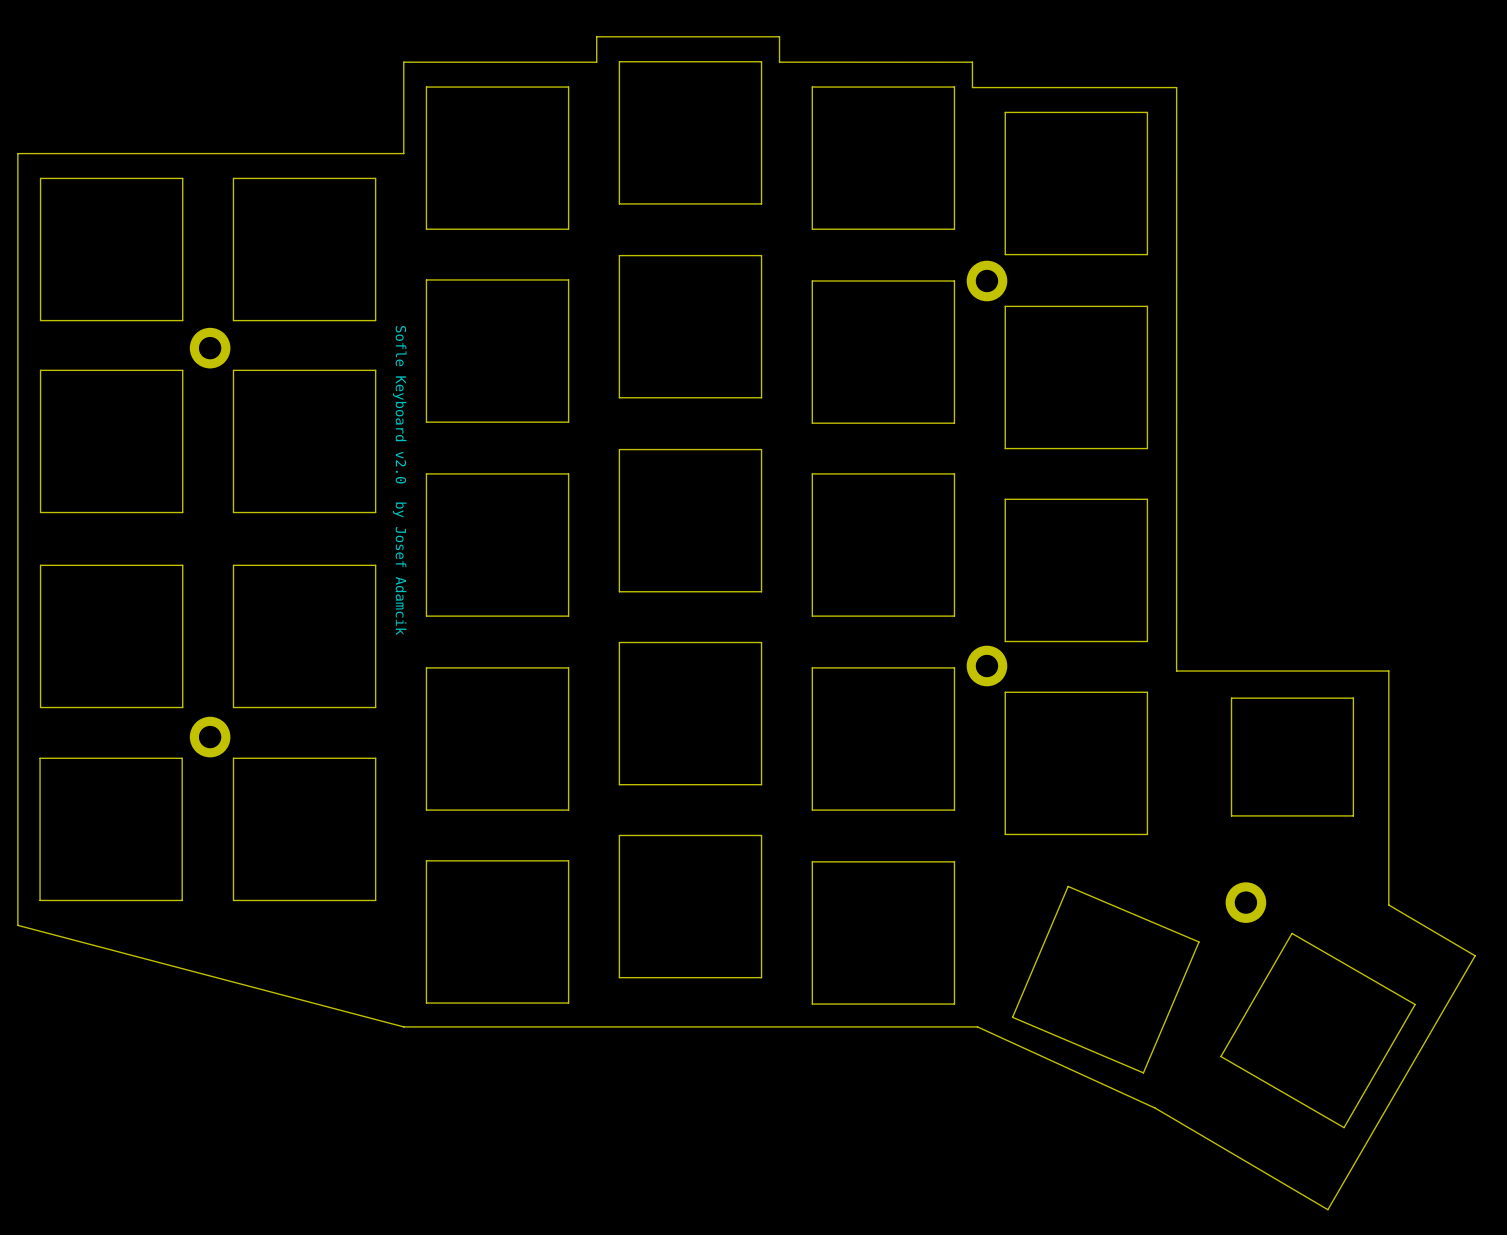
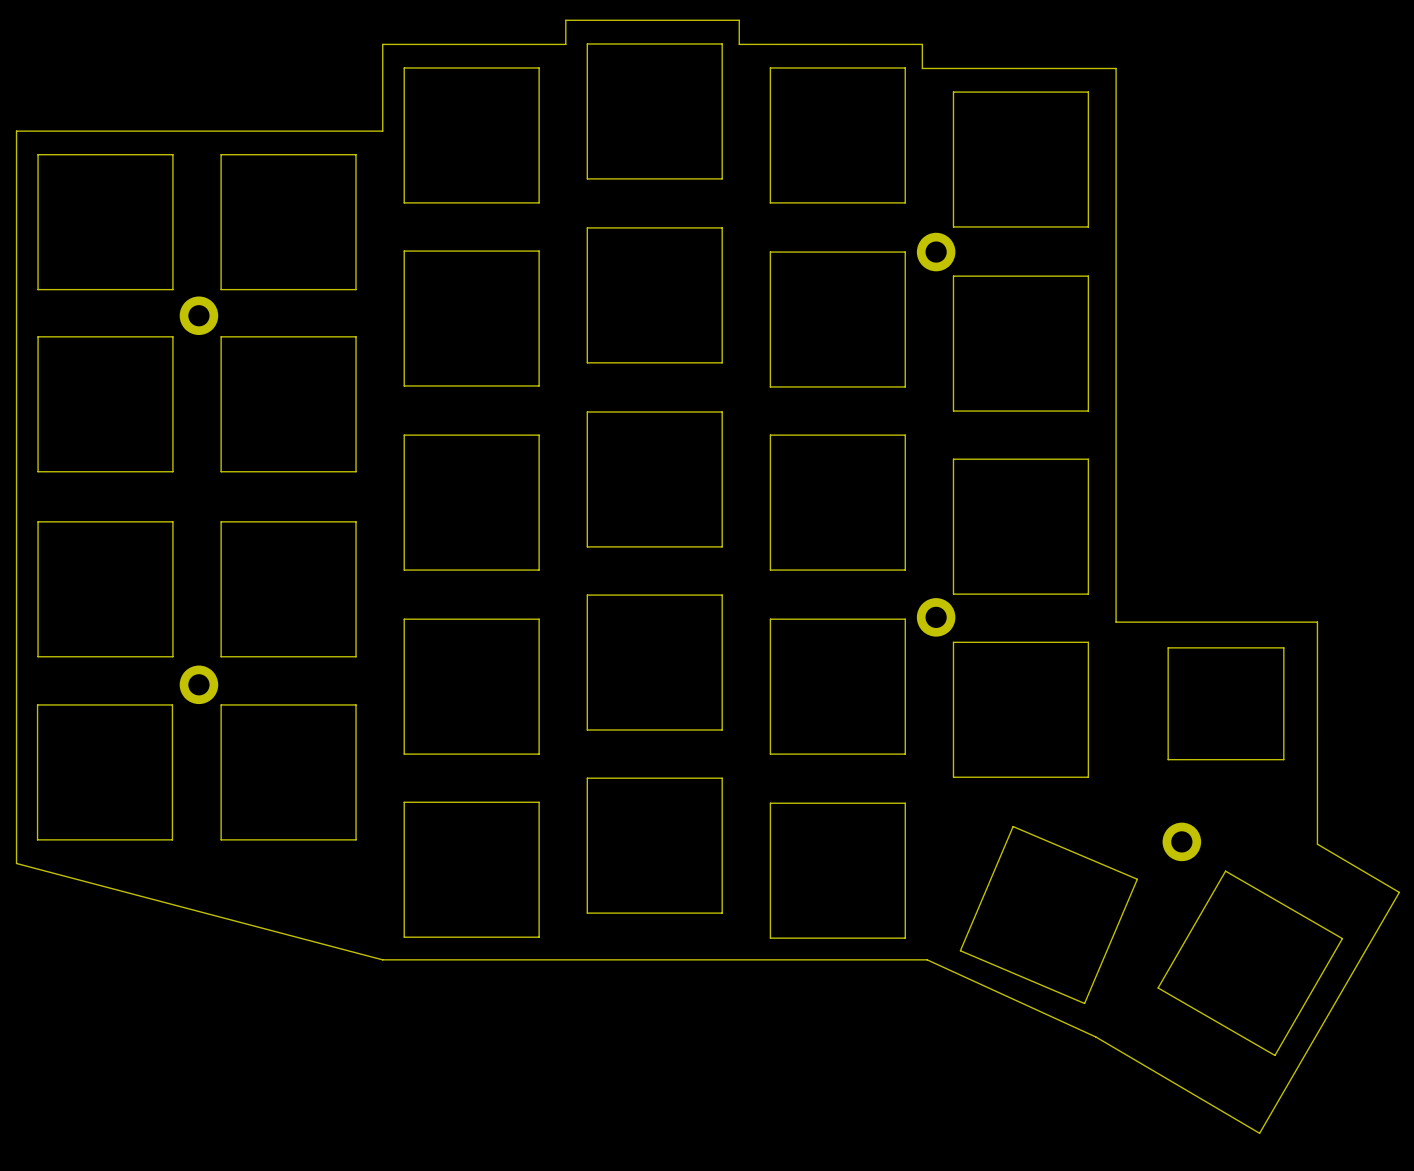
text: Sofle Keyboard v2.0 by Josef Adamcik (399, 480) -> none

